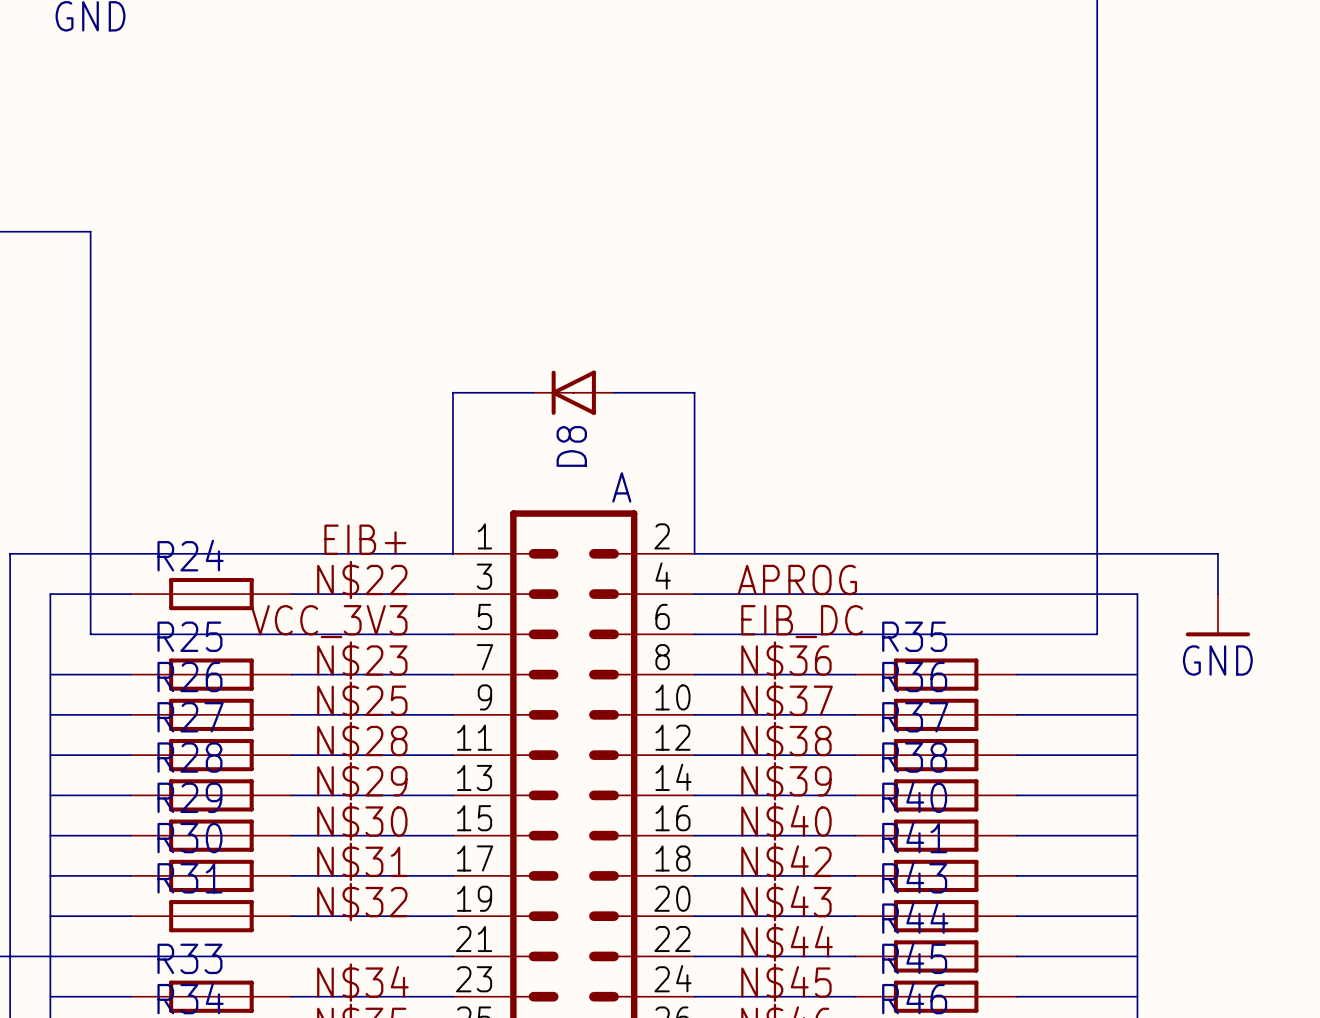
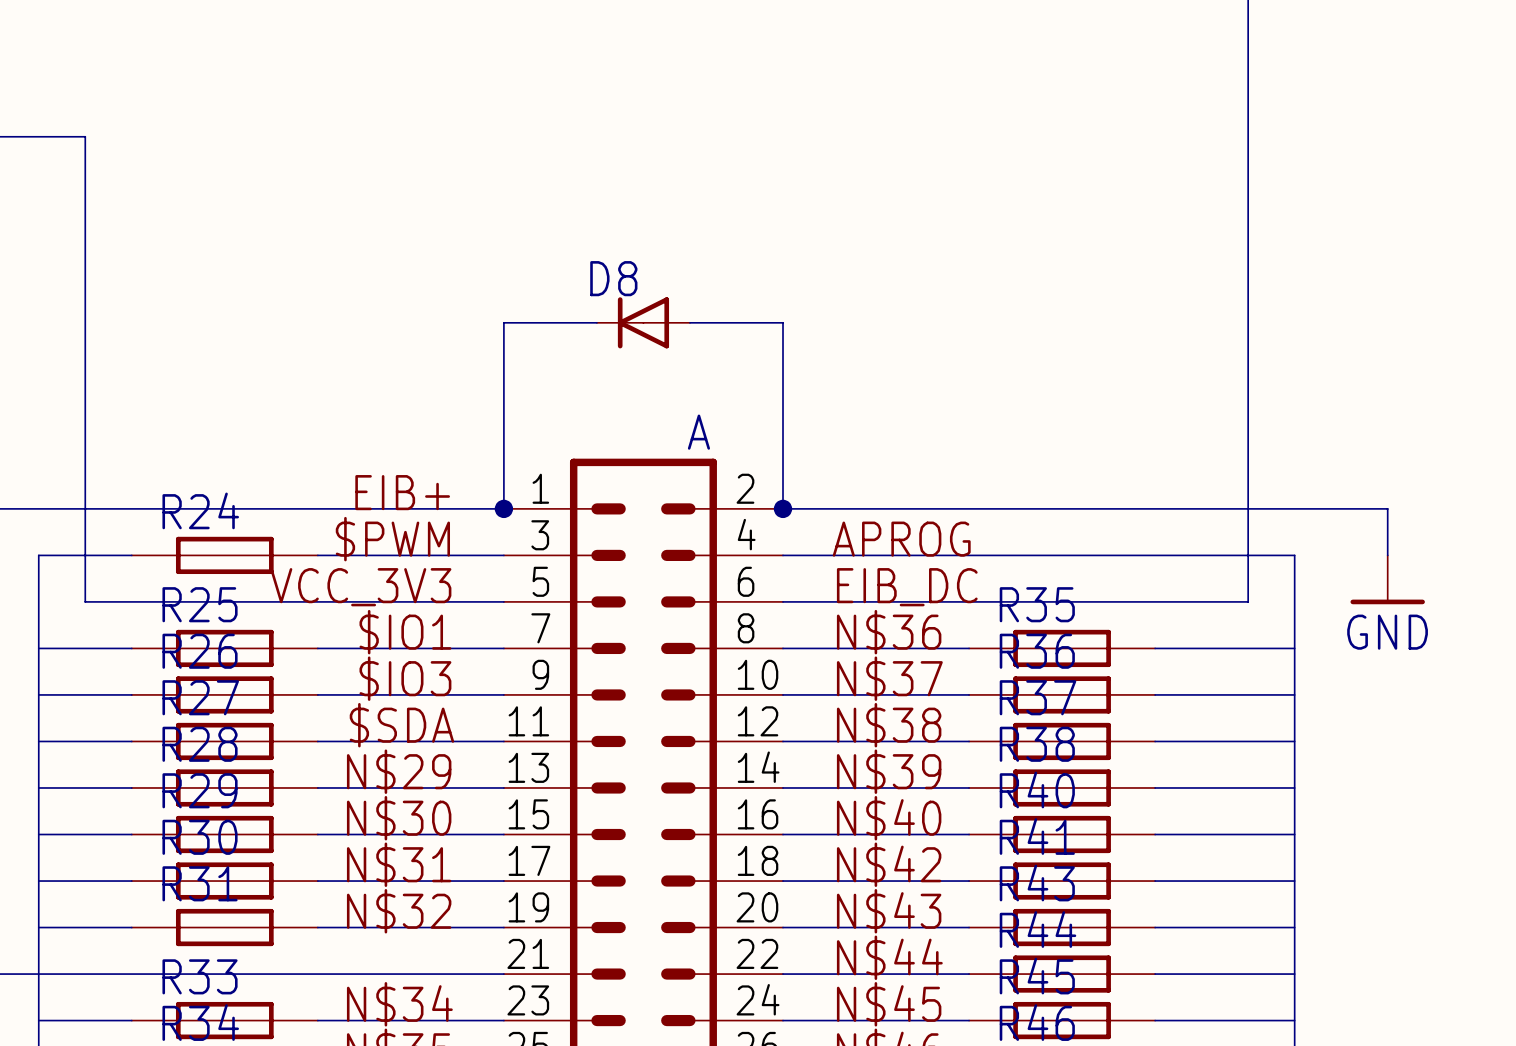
D8 name rotation: 0° (571, 446) -> 90° clockwise (613, 278)
D8 name position: D8 (571, 446) -> D8 (613, 278)
junction: none -> (503, 508)
junction: none -> (783, 508)
label: N$22 (362, 579) -> $PWM (392, 539)
label: N$23 (362, 660) -> $IO1 (405, 632)
label: N$25 (362, 700) -> $IO3 (405, 678)
label: N$28 (362, 741) -> $SDA (401, 725)

